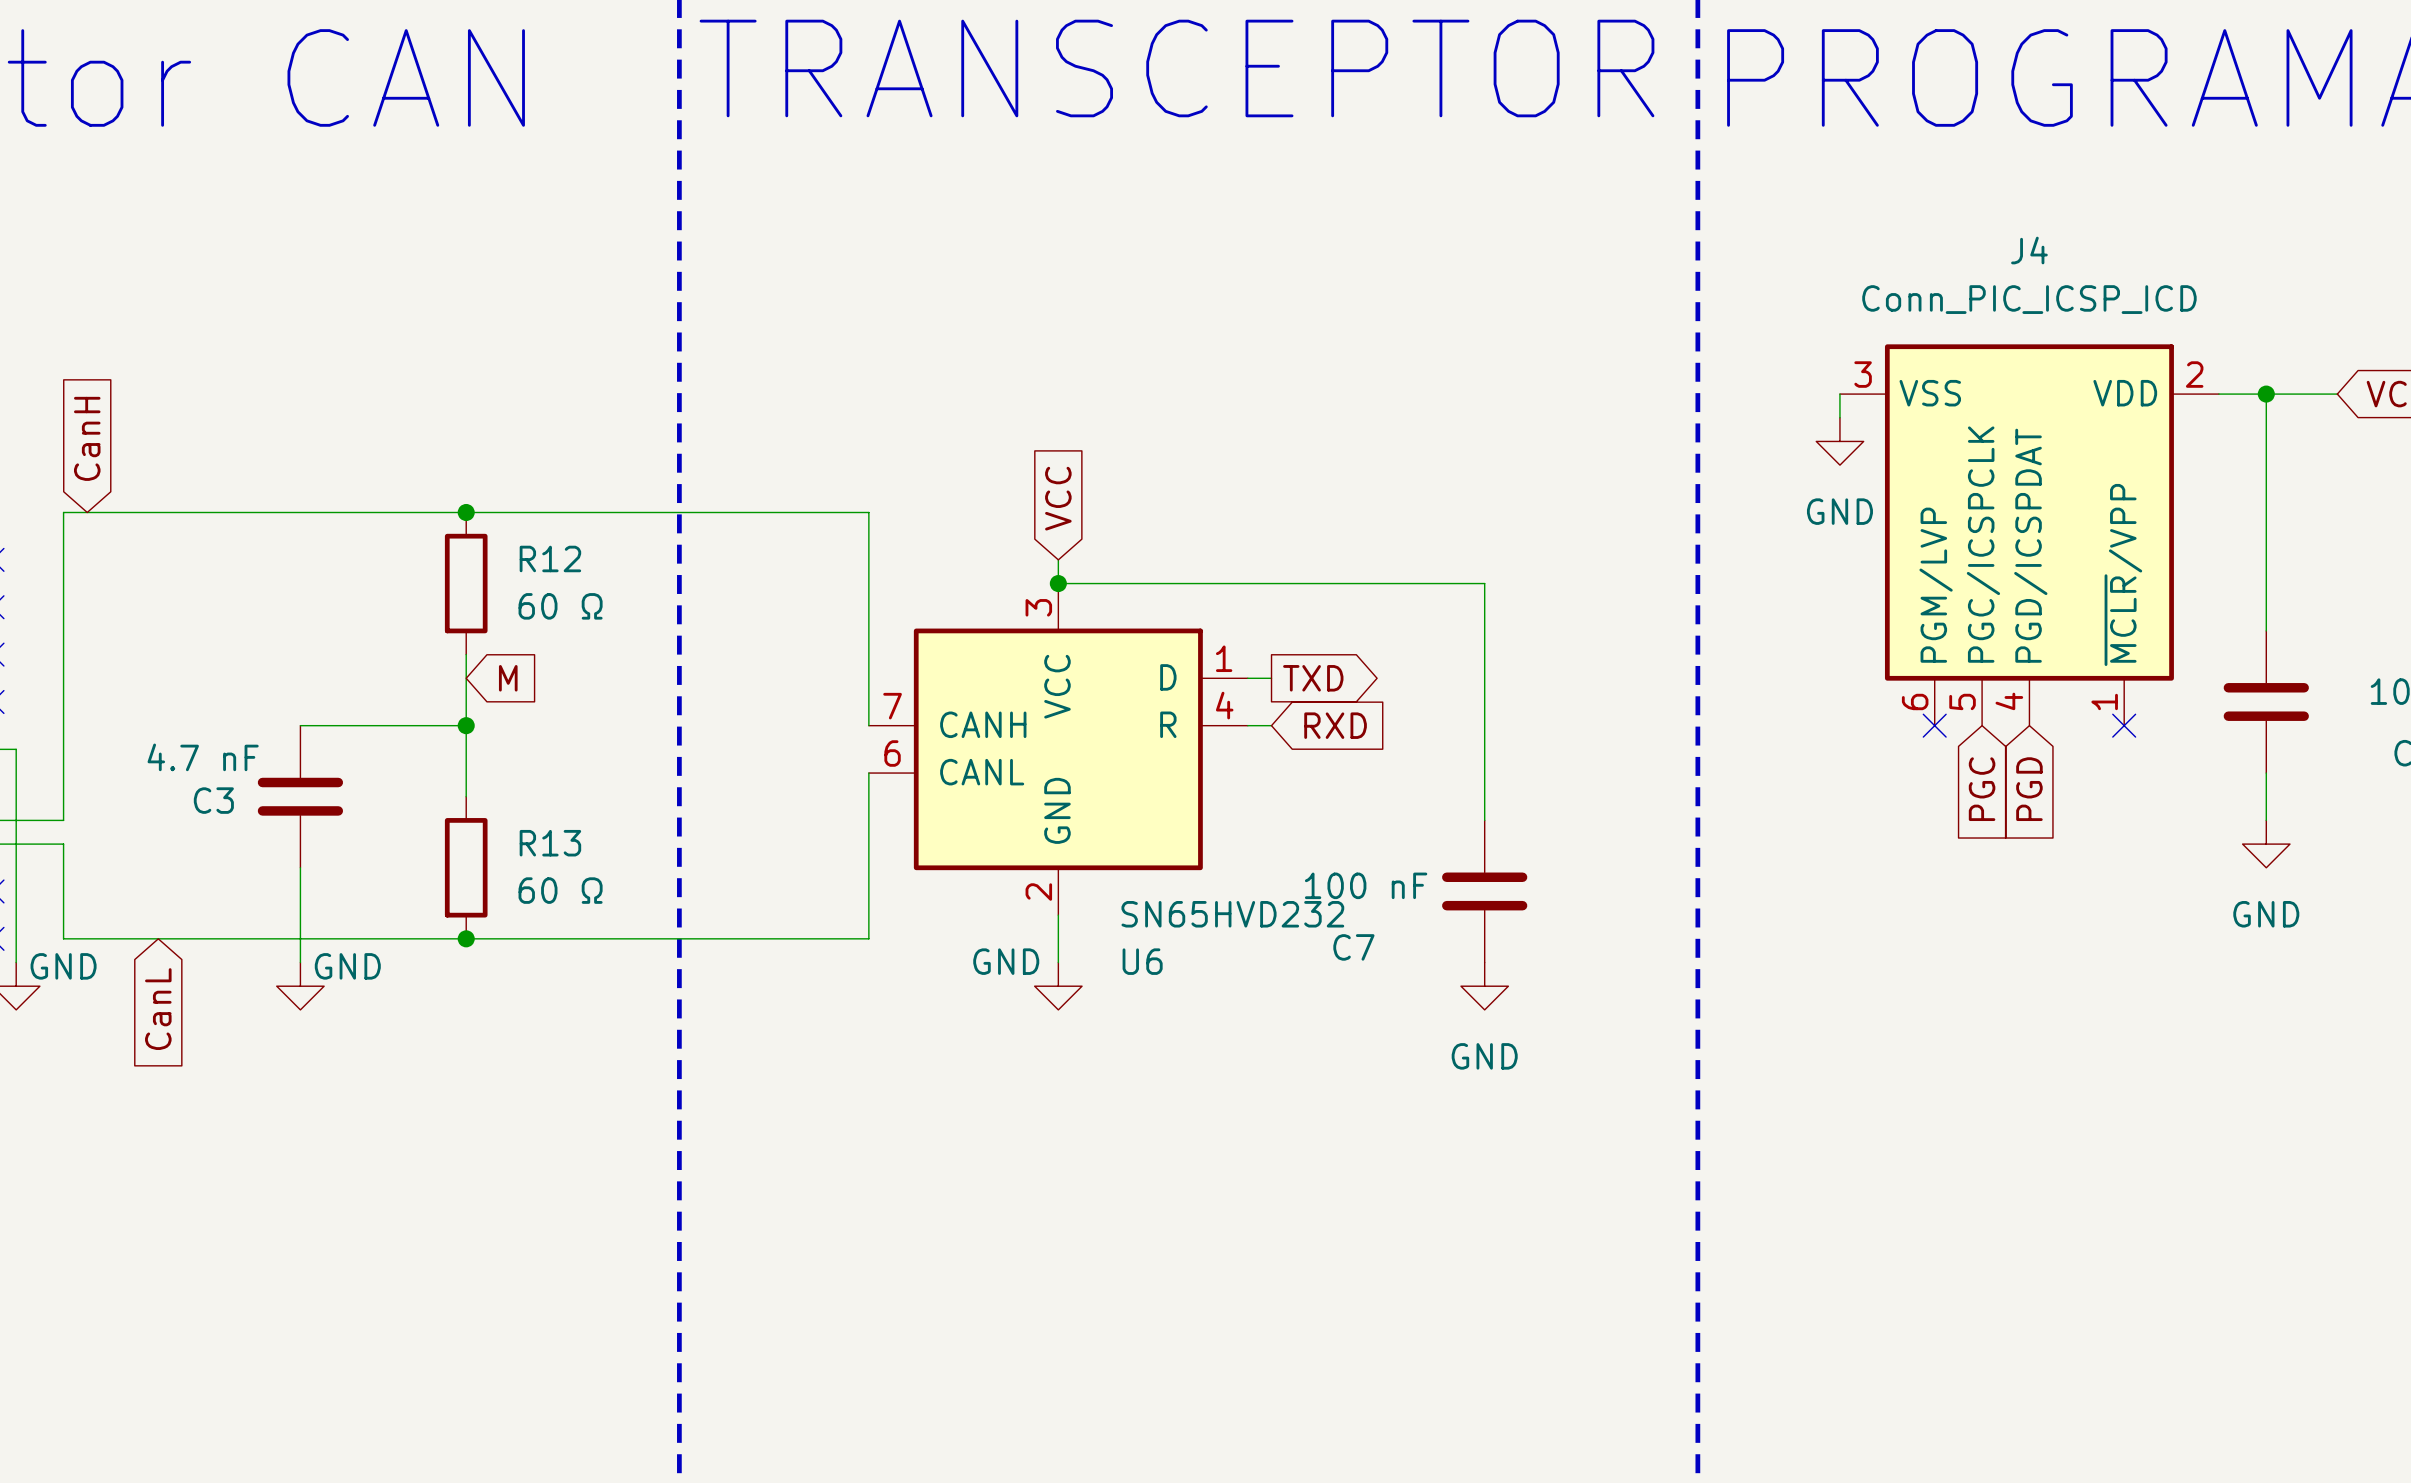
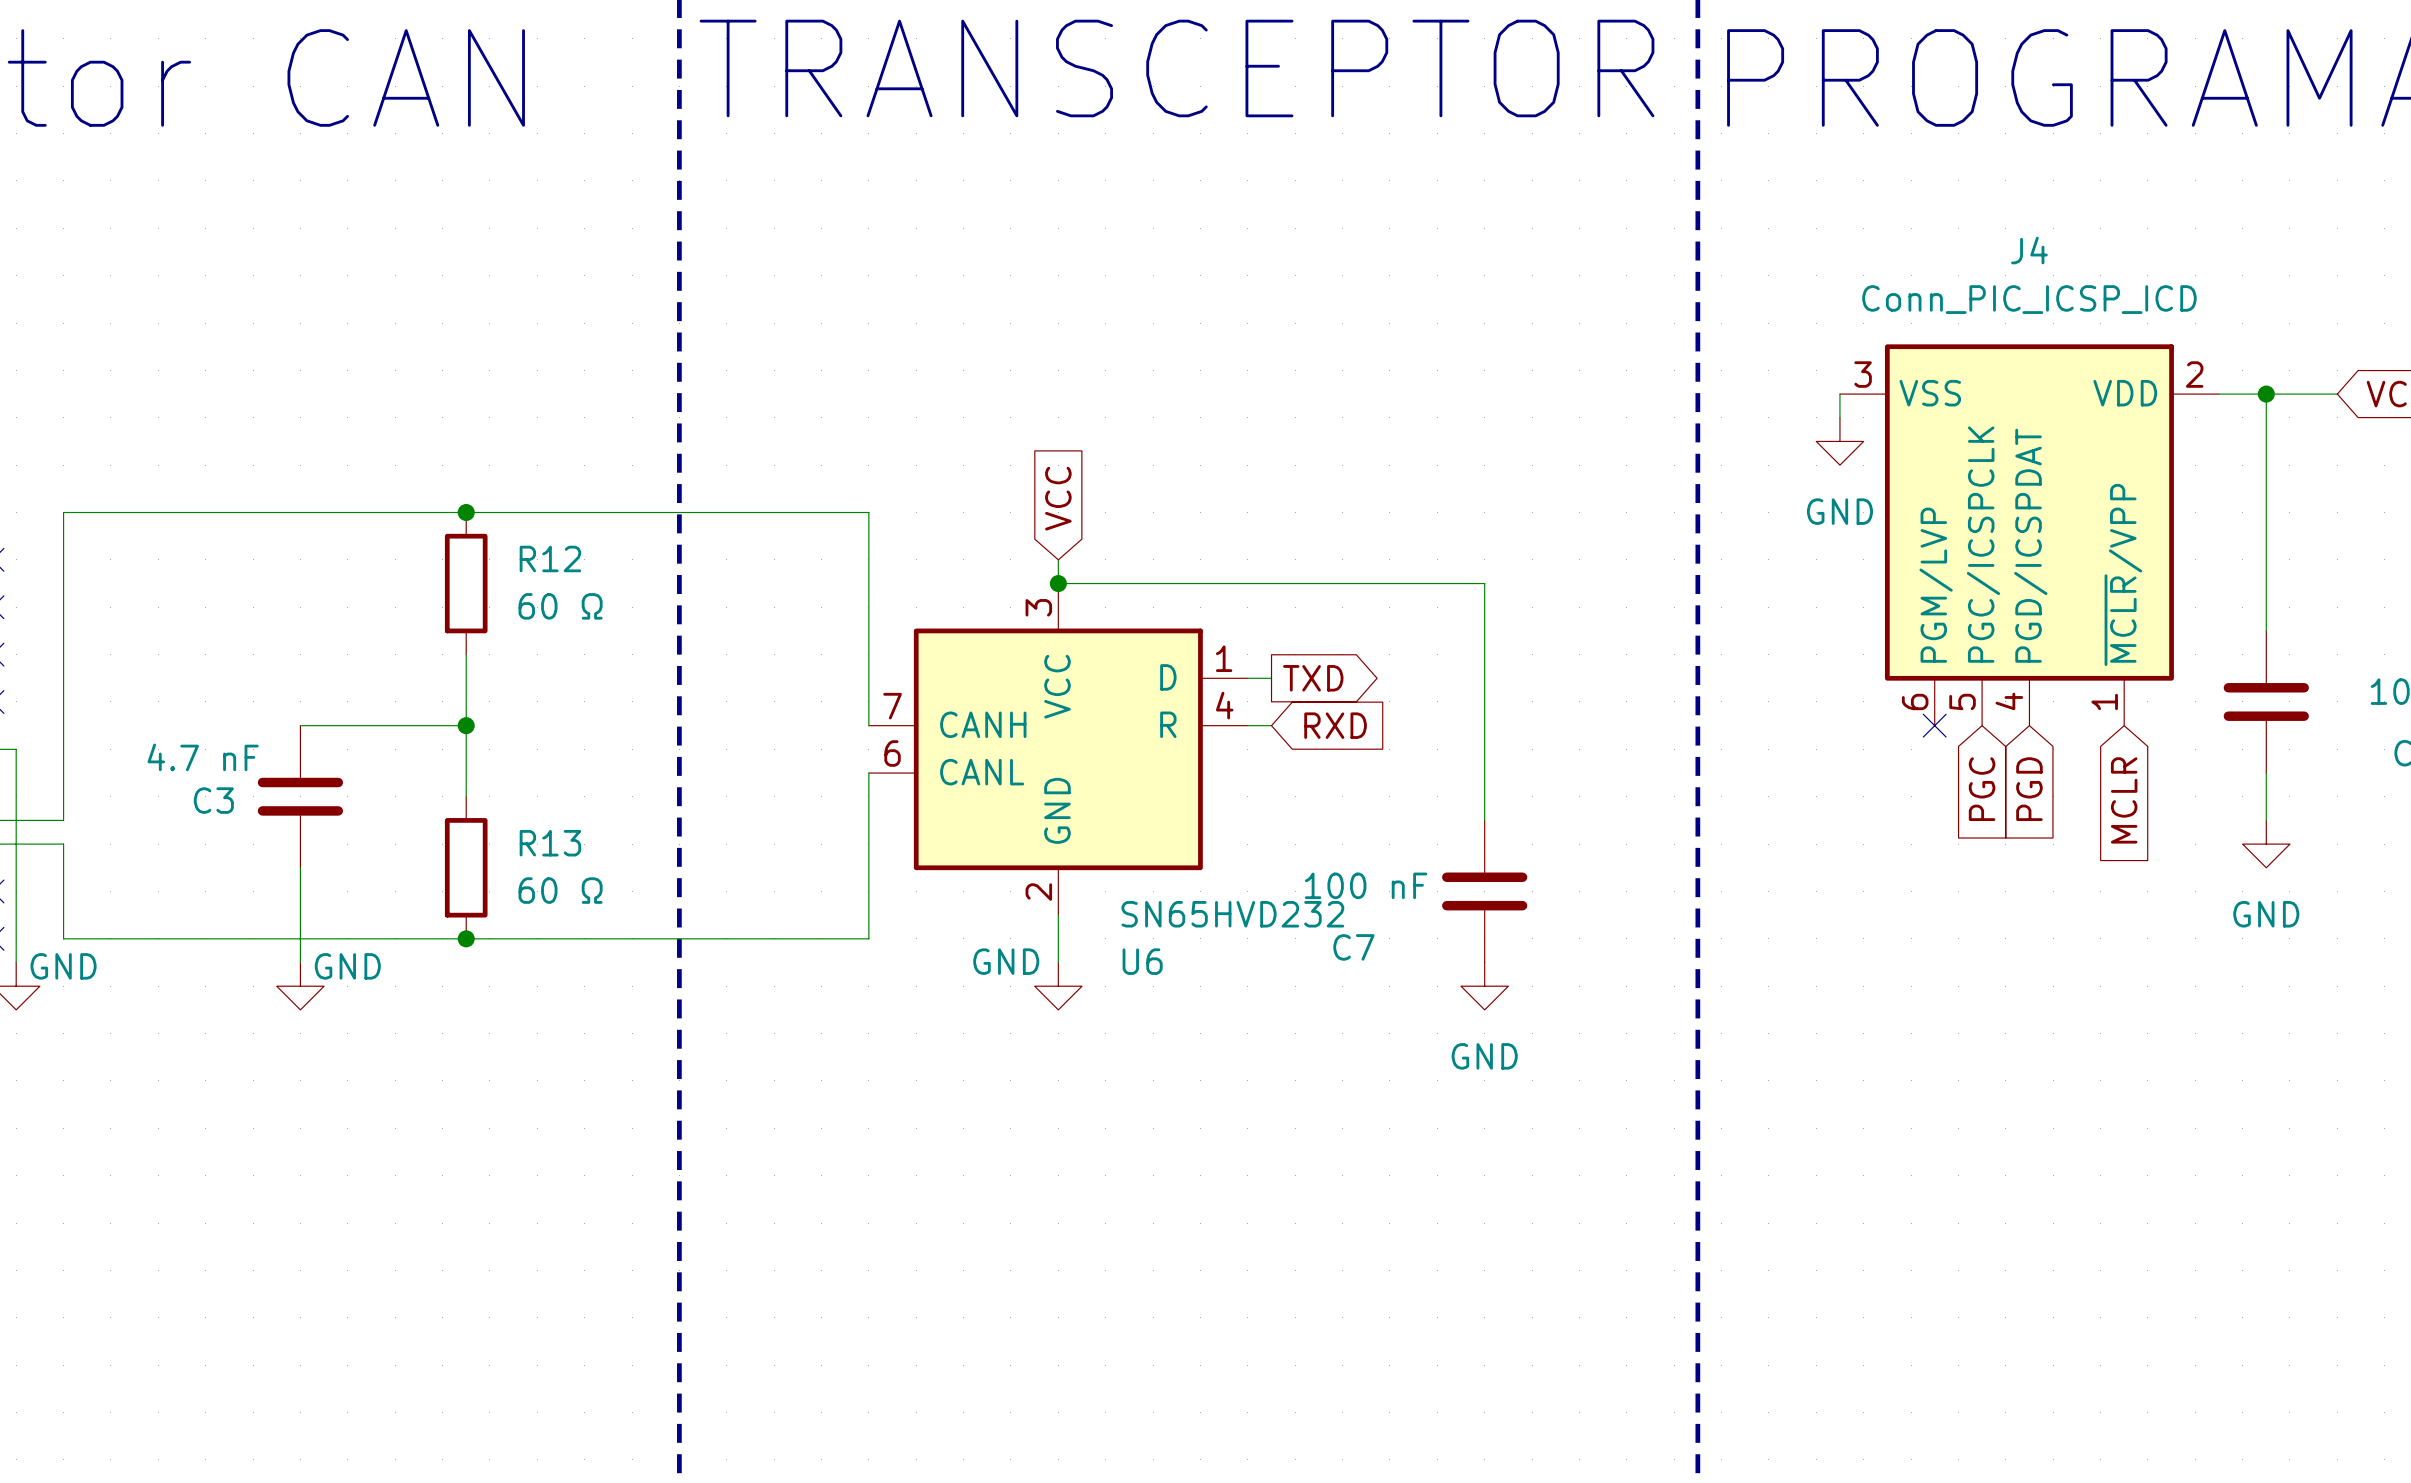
global label: CanH (87, 438) -> none
global label: M (508, 678) -> none
no-connect mark: (2124, 725) -> none
global label: none -> MCLR (2124, 800)
global label: CanL (158, 1009) -> none

